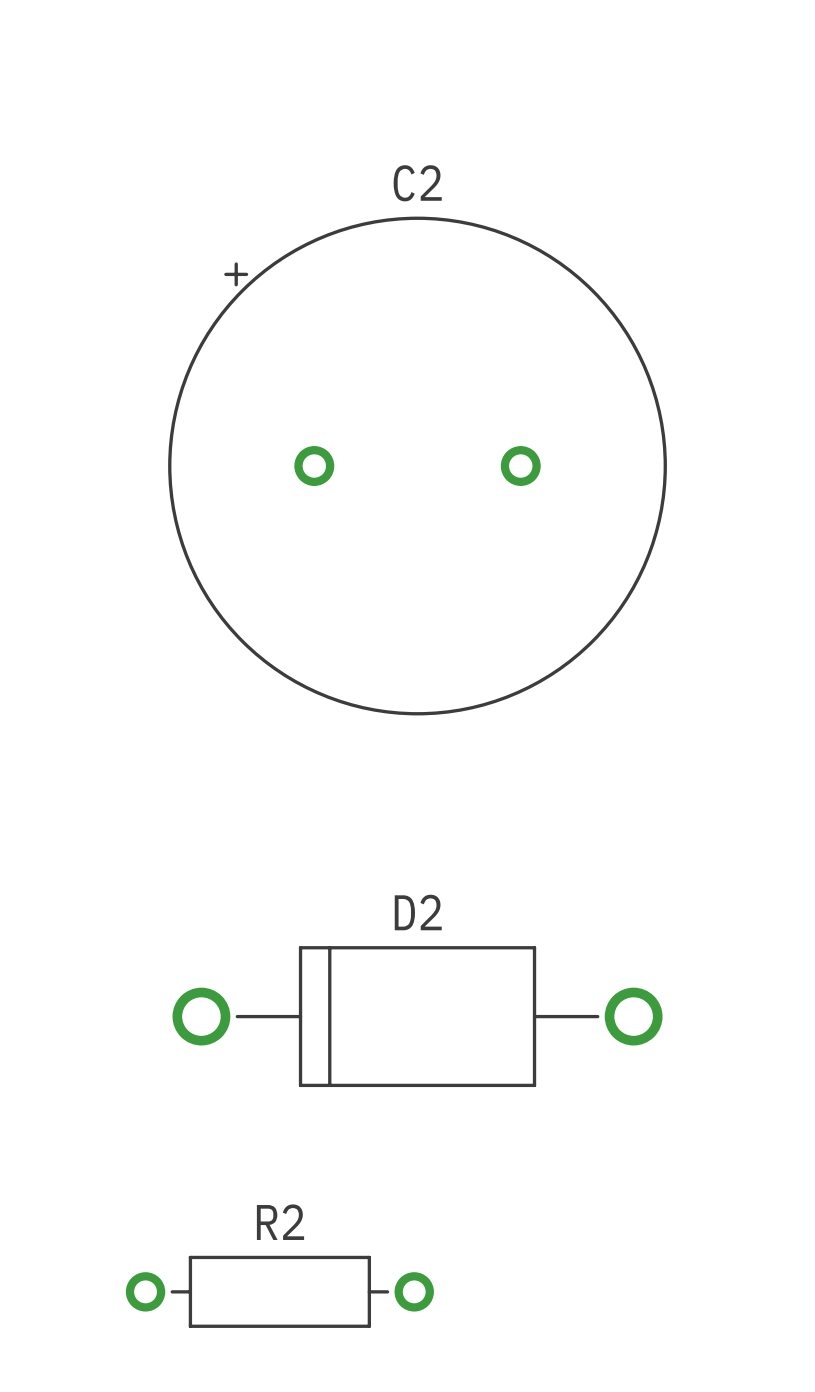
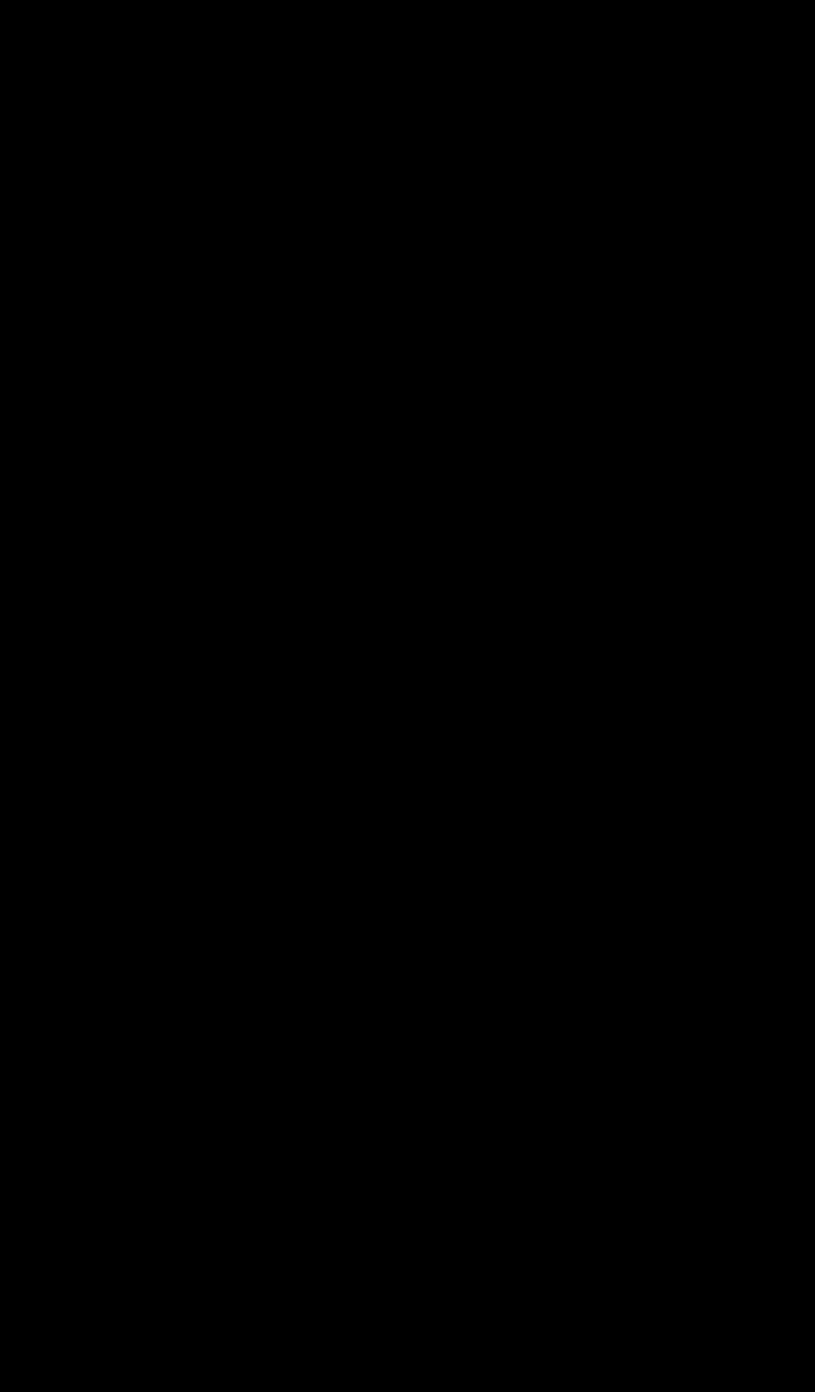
C2: (417, 466) -> none
D2: (417, 1016) -> none
R2: (279, 1291) -> none

